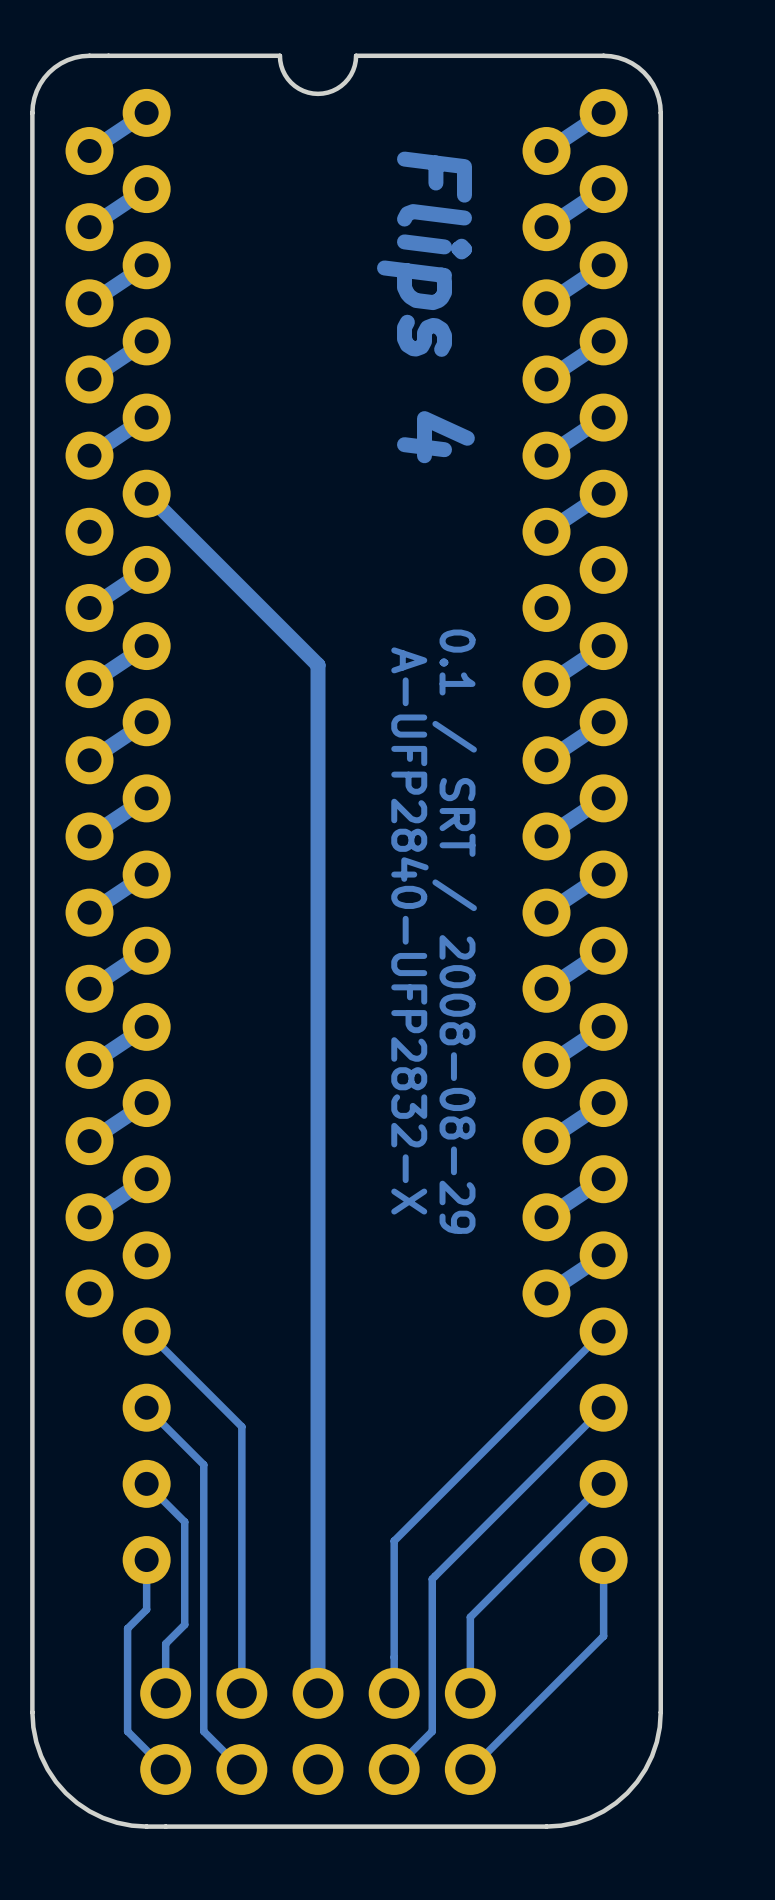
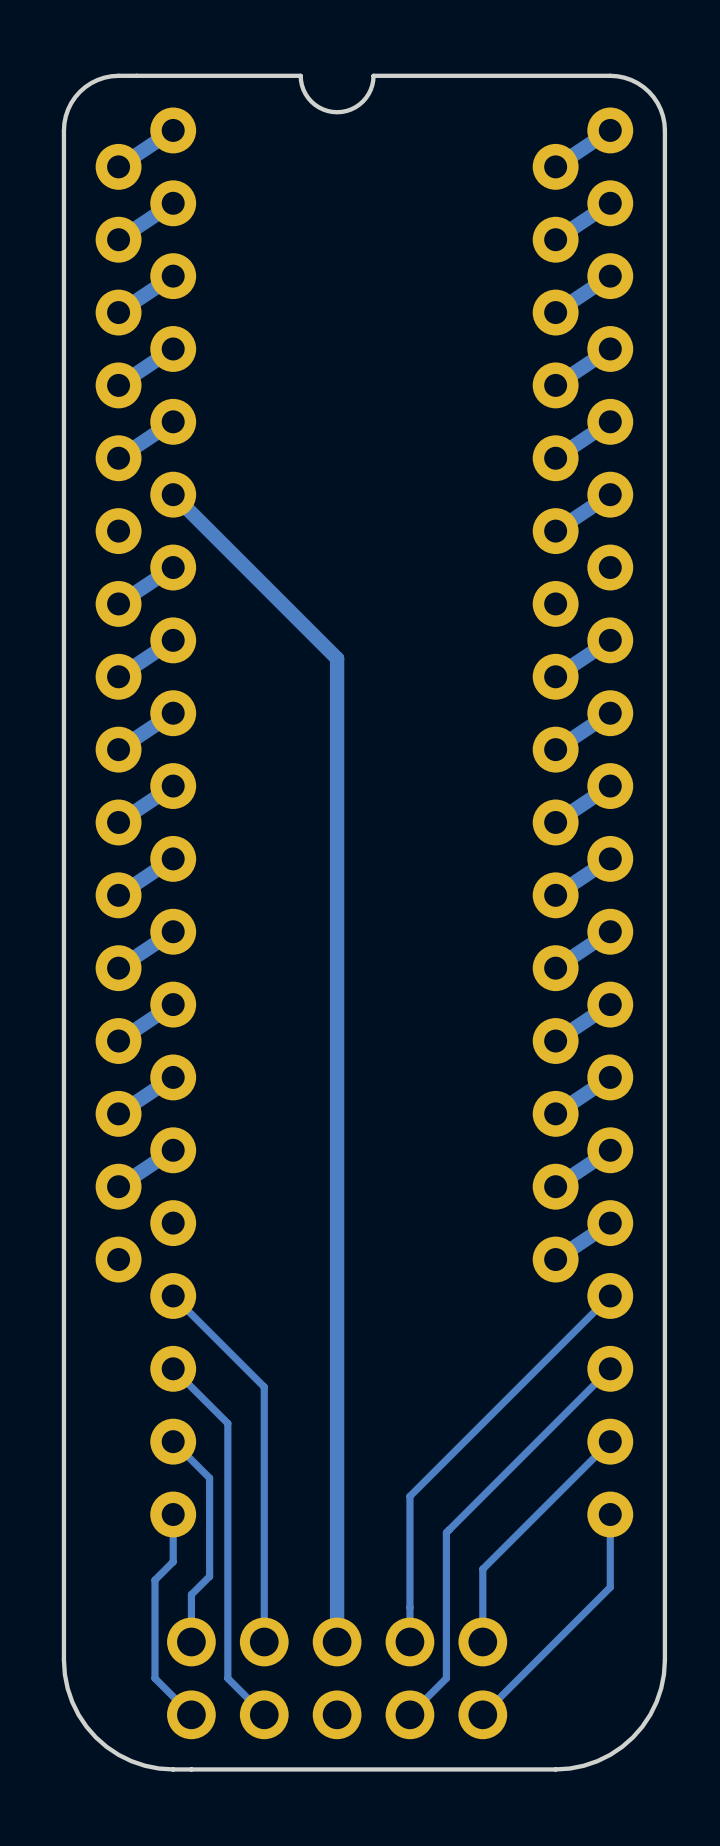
text: Flips 4 (425, 307) -> none
text: A-UFP2840-UFP2832-X (409, 930) -> none
text: 0.1 / SRT / 2008-08-29 (454, 931) -> none

